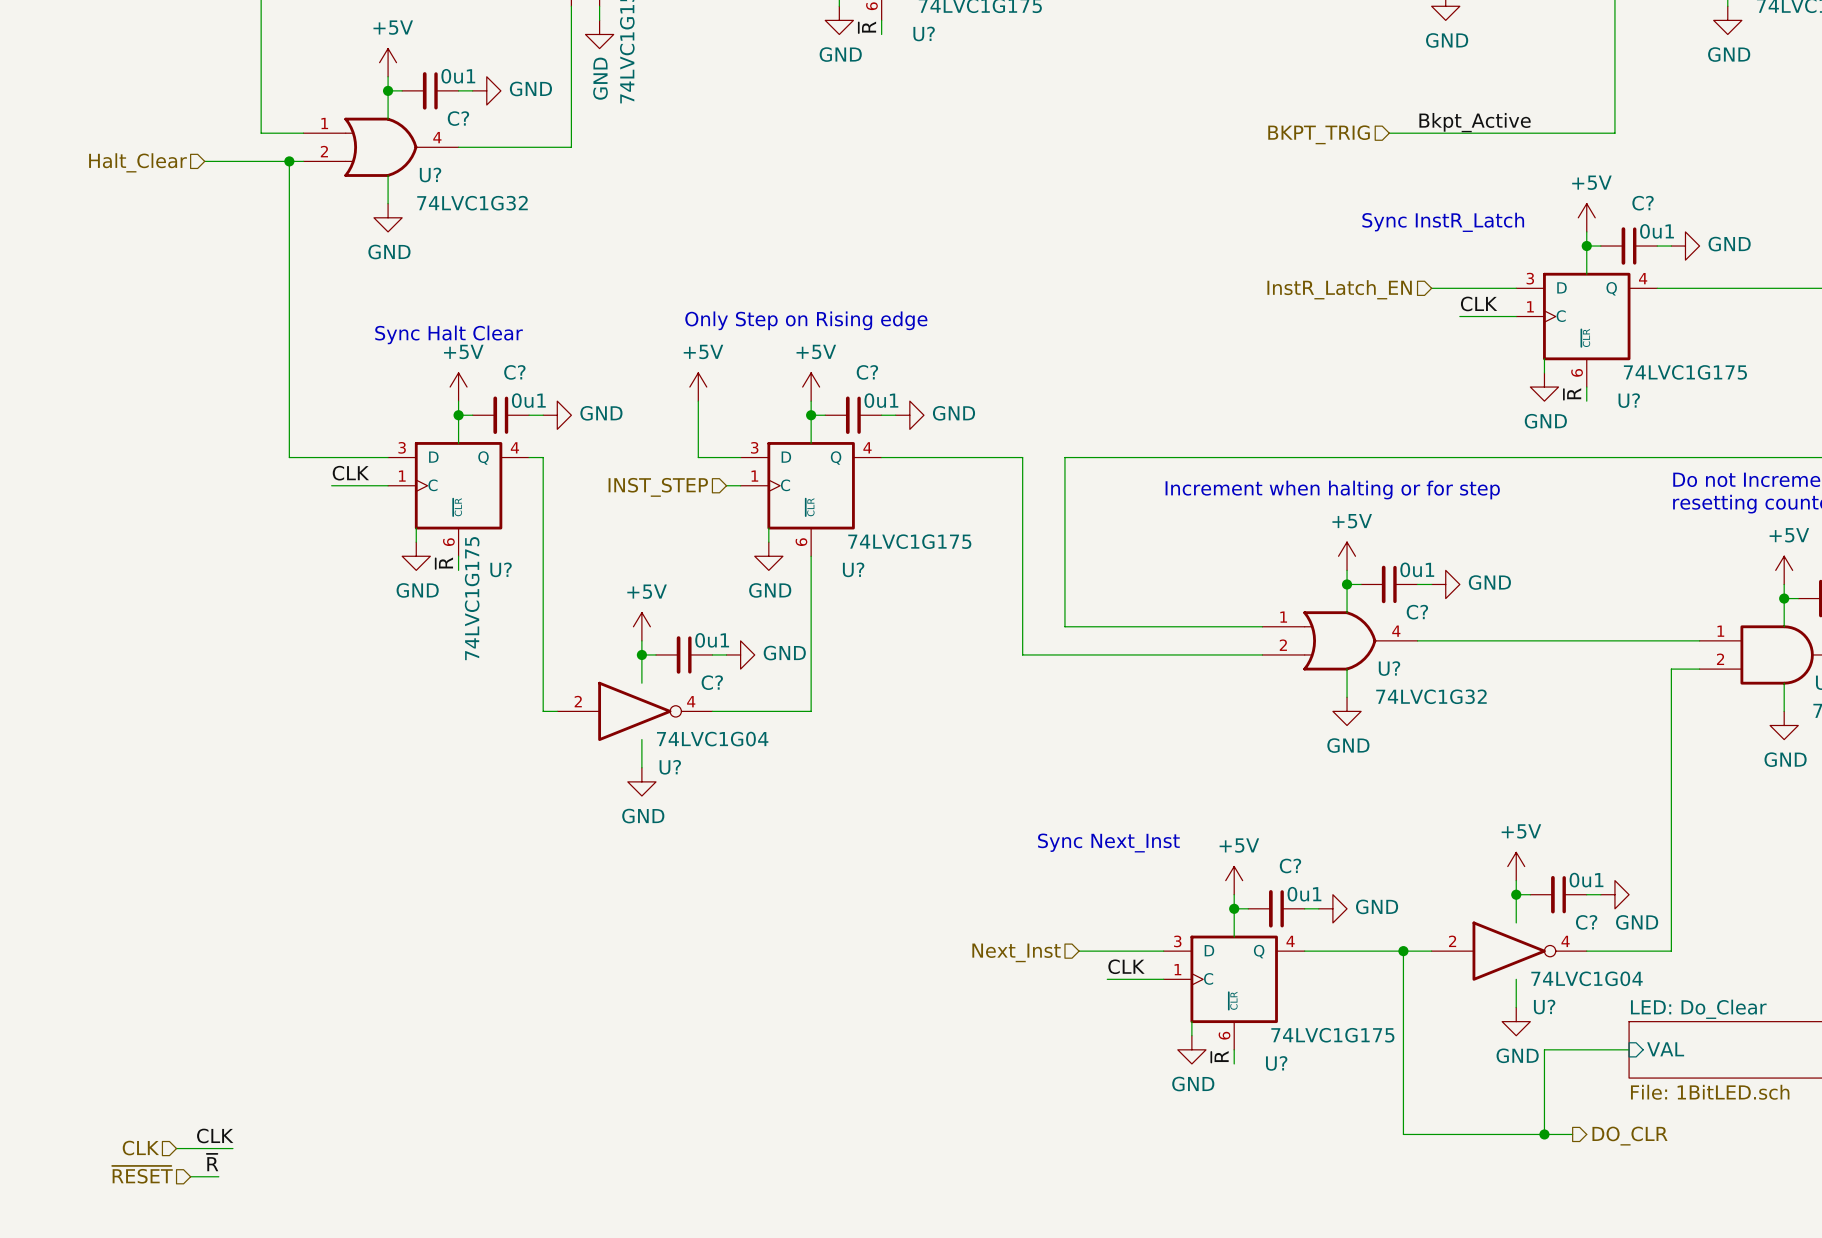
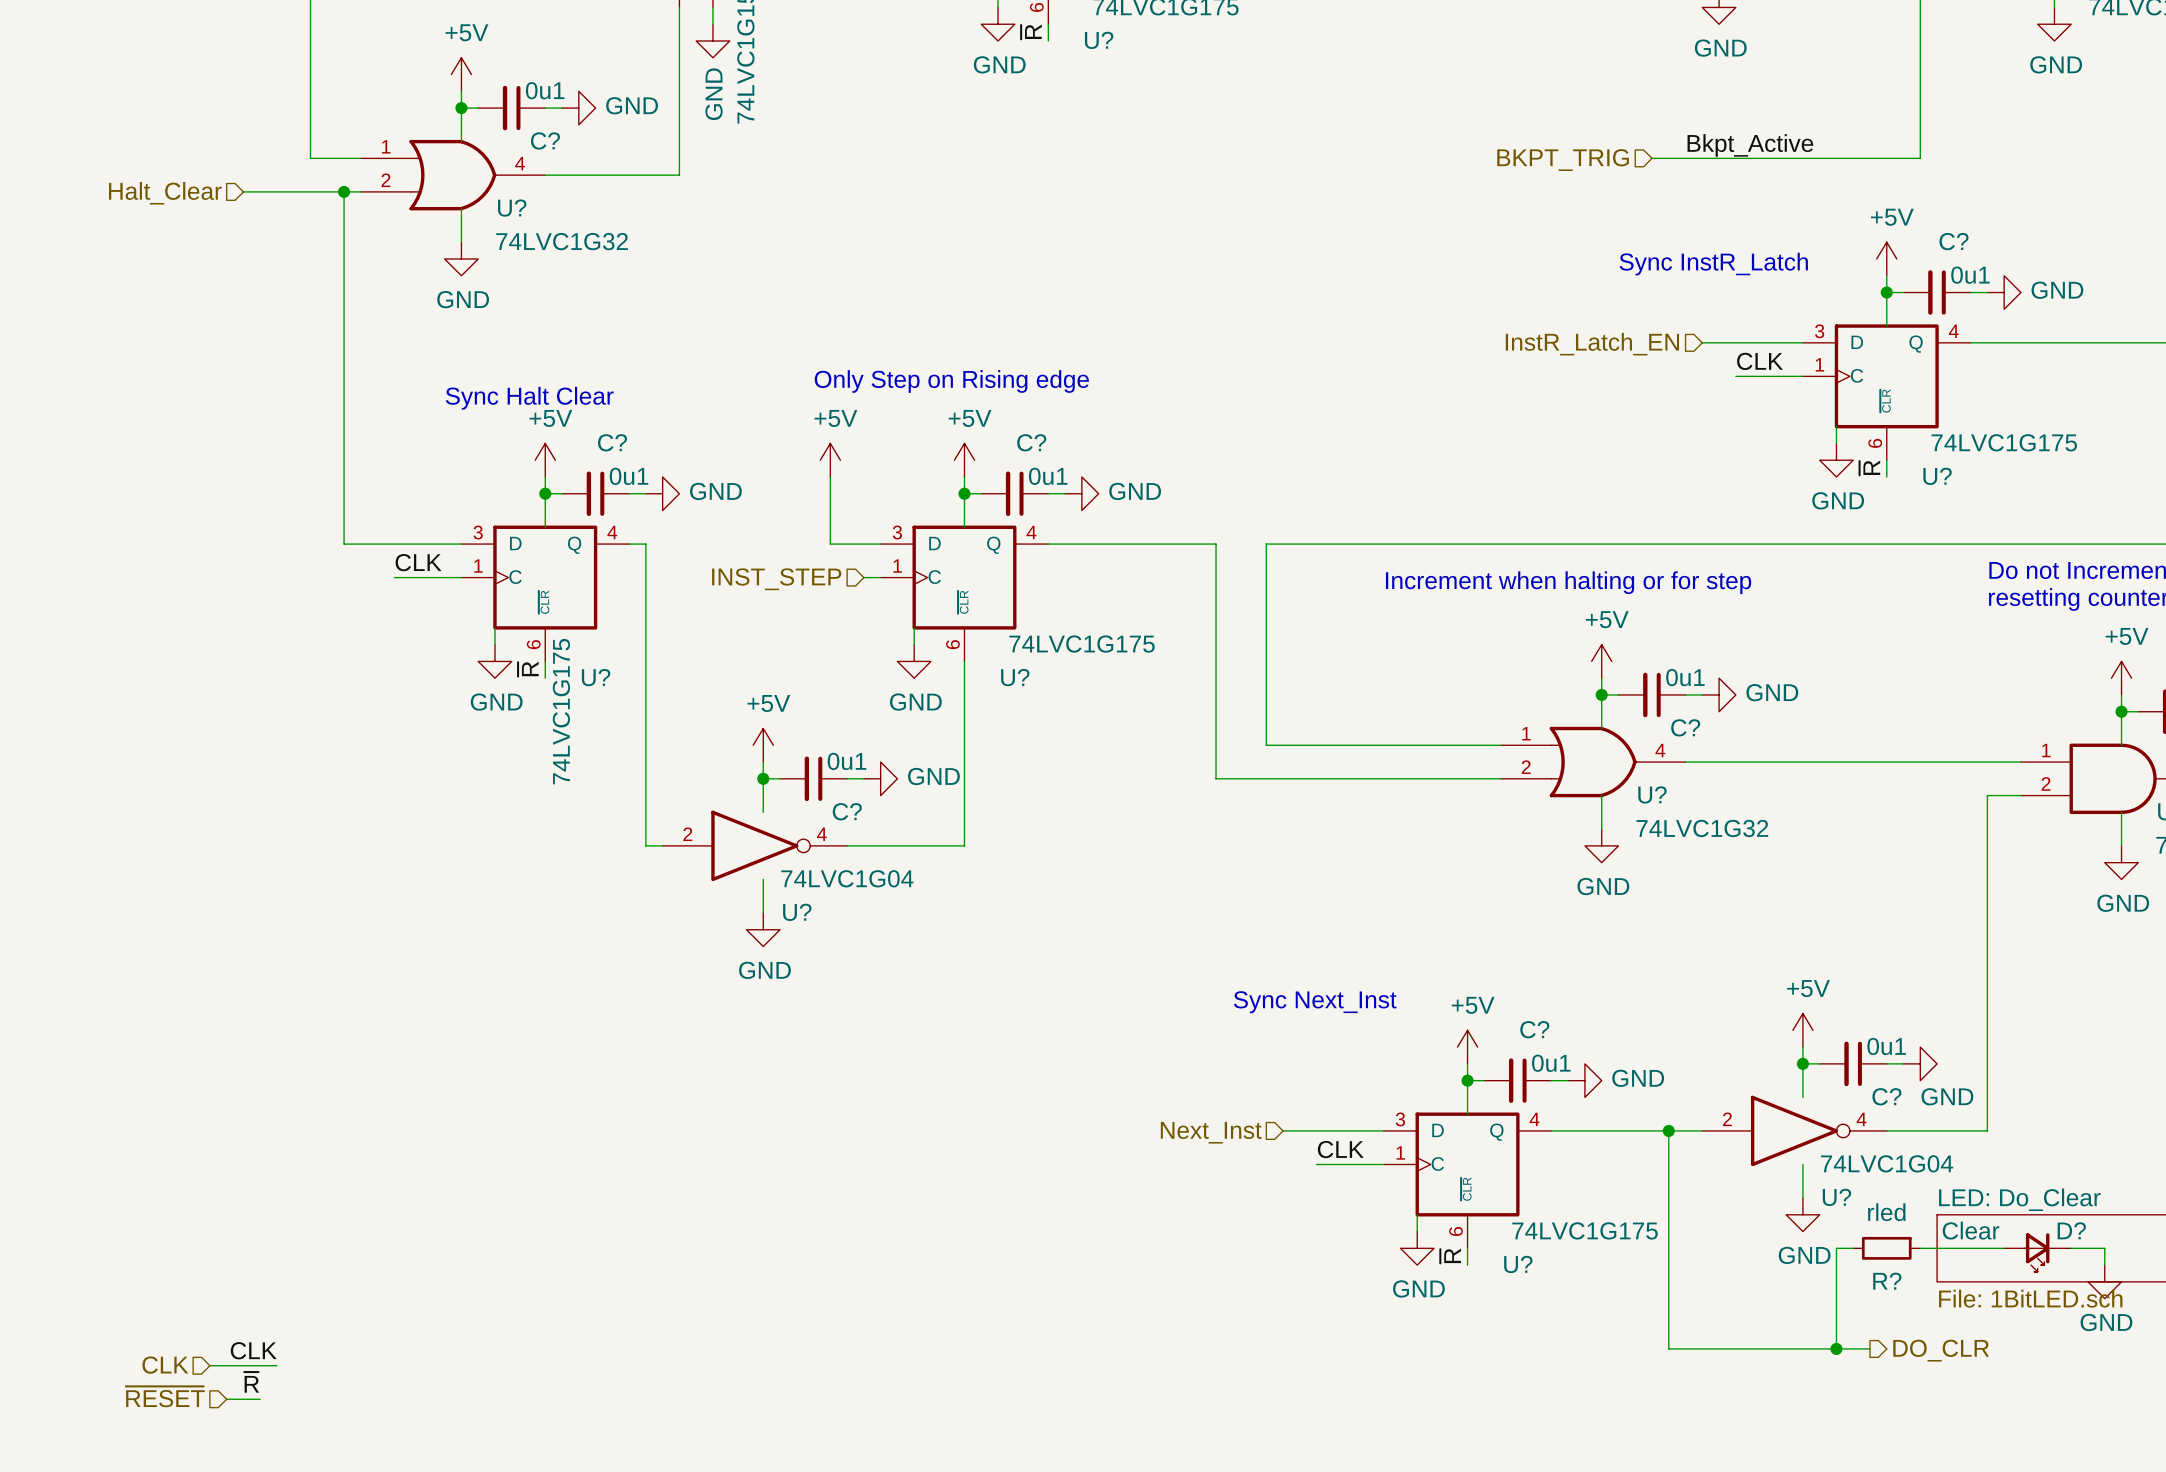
wire: (1558, 1049) (1614, 1049) -> (1937, 1248) (2004, 1248)
R?: none -> rled (1886, 1248)
sheet pin: VAL (1665, 1049) -> none
wire: none -> (2071, 1248) (2104, 1248) (2104, 1265)
D?: none -> Clear (2037, 1252)
power symbol: none -> GND (2104, 1281)

